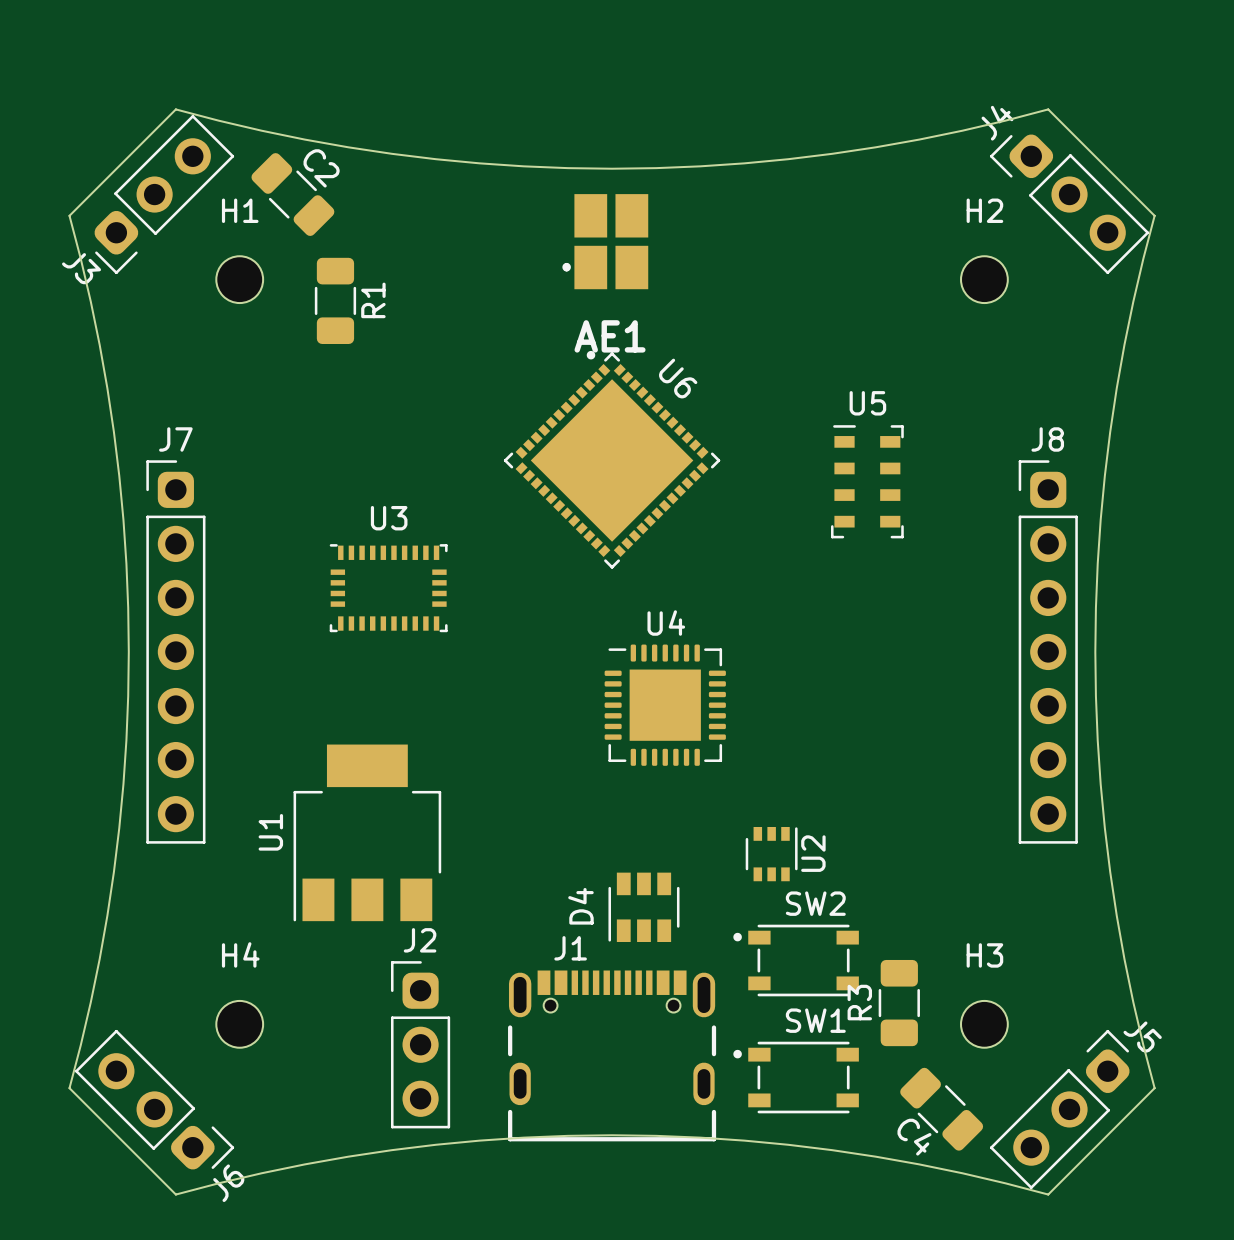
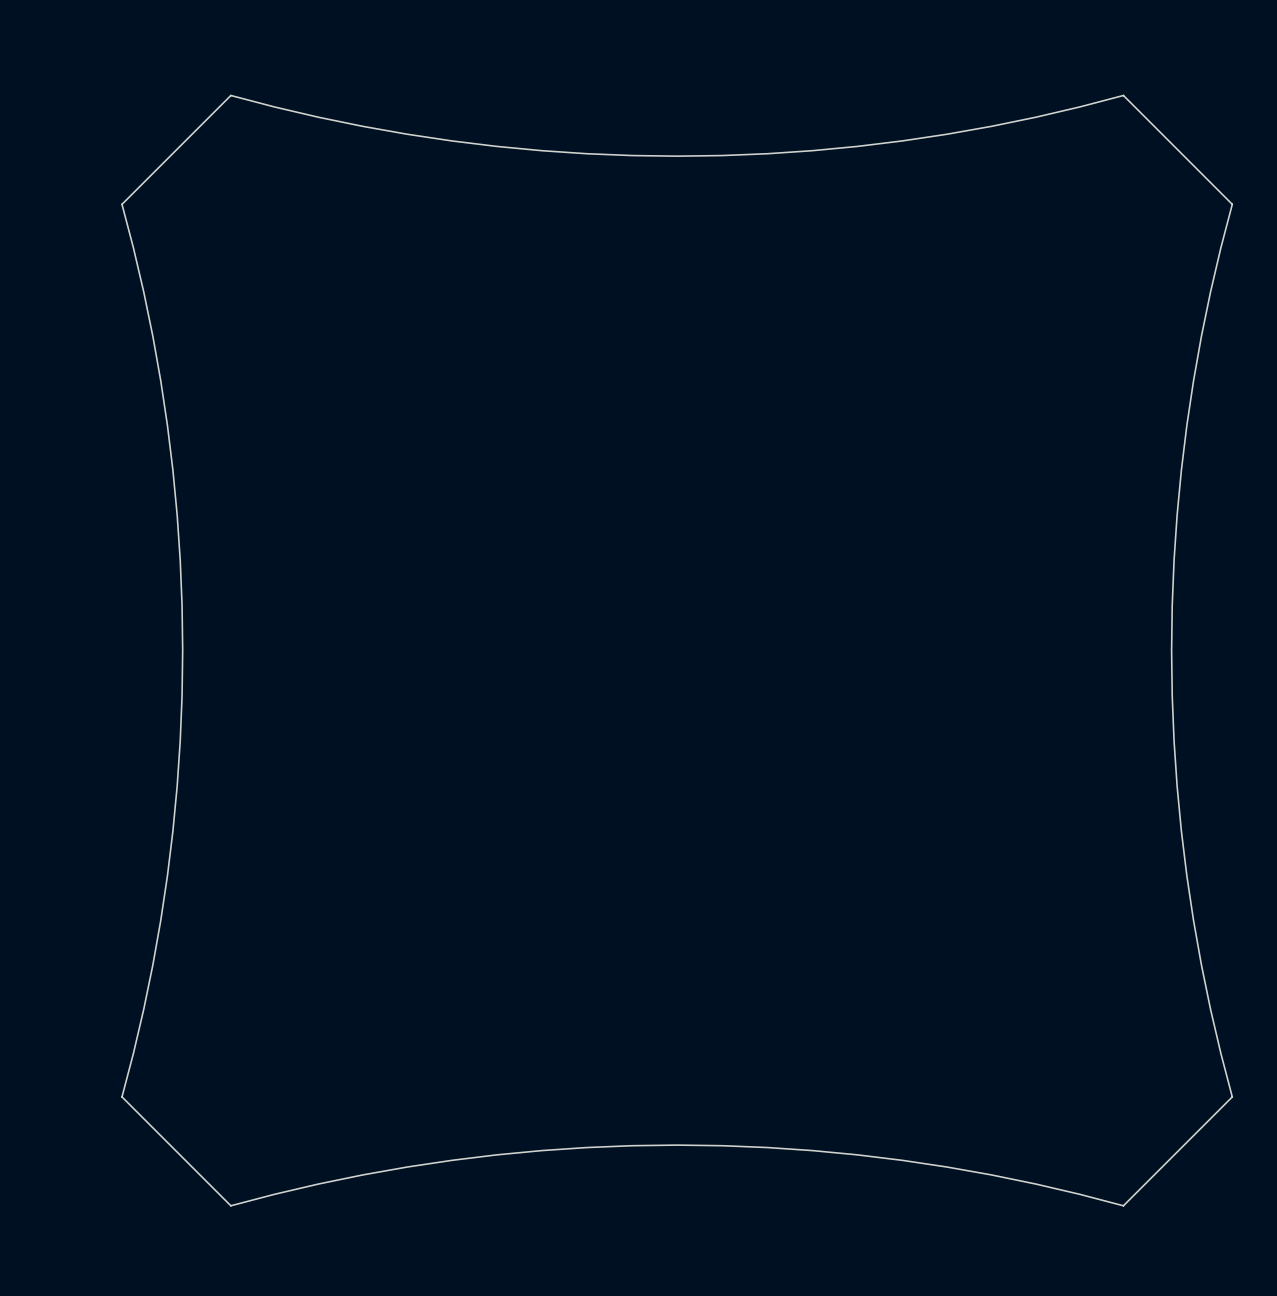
J3: (164, 194) -> none
C2: (292, 194) -> none
J4: (1069, 204) -> none
AE1: (605, 241) -> none
H1: (239, 279) -> none
H2: (984, 279) -> none
R1: (335, 300) -> none
U6: (612, 459) -> none
U5: (867, 481) -> none
U3: (388, 588) -> none
J7: (175, 651) -> none
J8: (1048, 651) -> none
U4: (665, 705) -> none
U1: (367, 832) -> none
U2: (771, 854) -> none
D4: (643, 907) -> none
SW2: (796, 960) -> none
R3: (899, 1003) -> none
H4: (239, 1024) -> none
H3: (984, 1024) -> none
J2: (420, 1044) -> none
J1: (612, 1055) -> none
SW1: (796, 1077) -> none
J6: (154, 1099) -> none
C4: (941, 1109) -> none
J5: (1059, 1109) -> none

